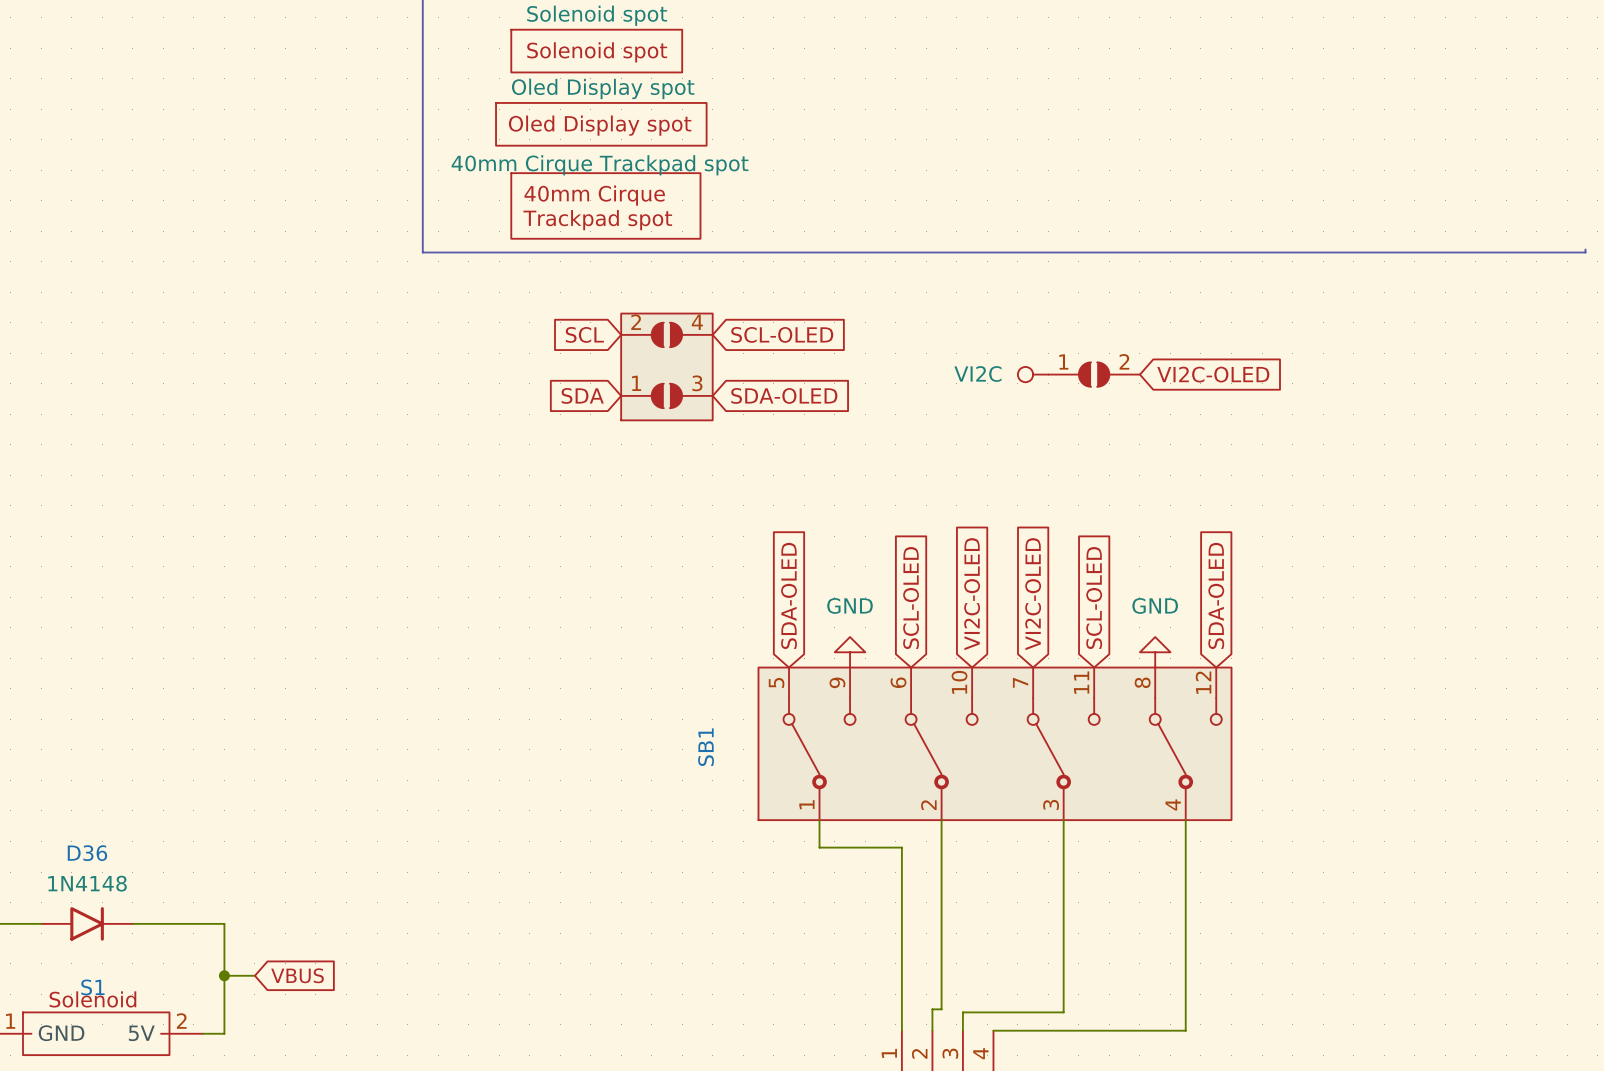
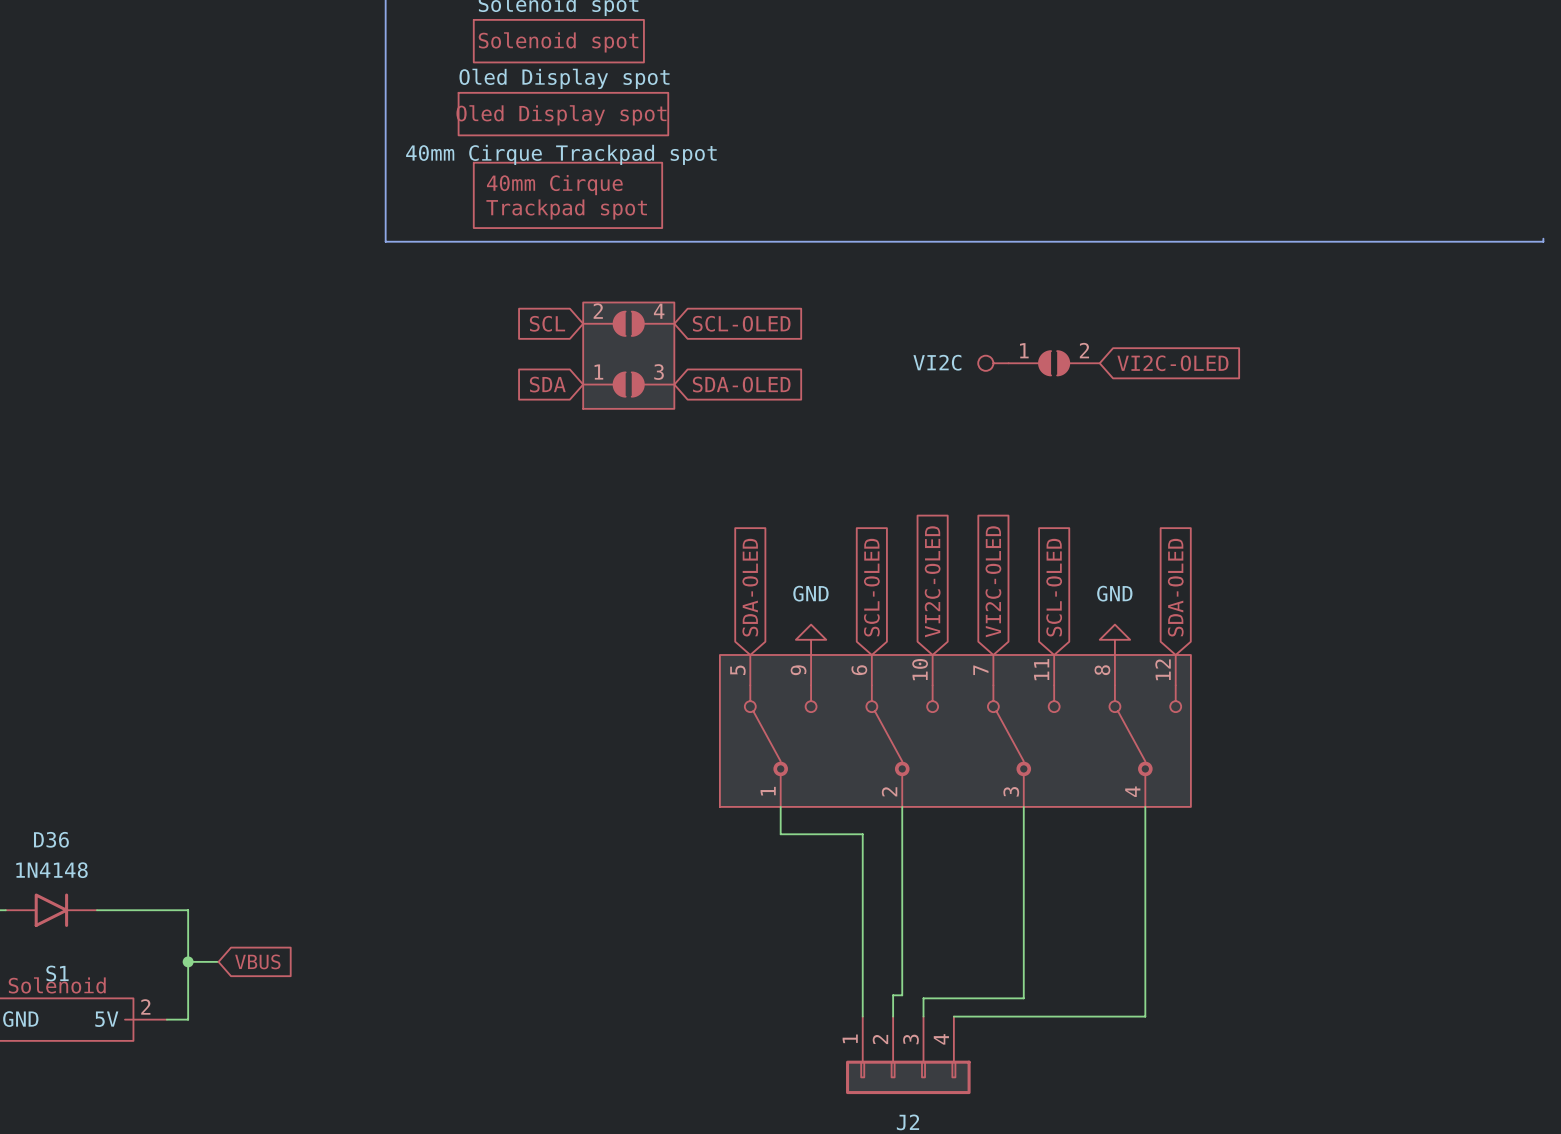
SB1 name: SB1 (706, 747) -> none

